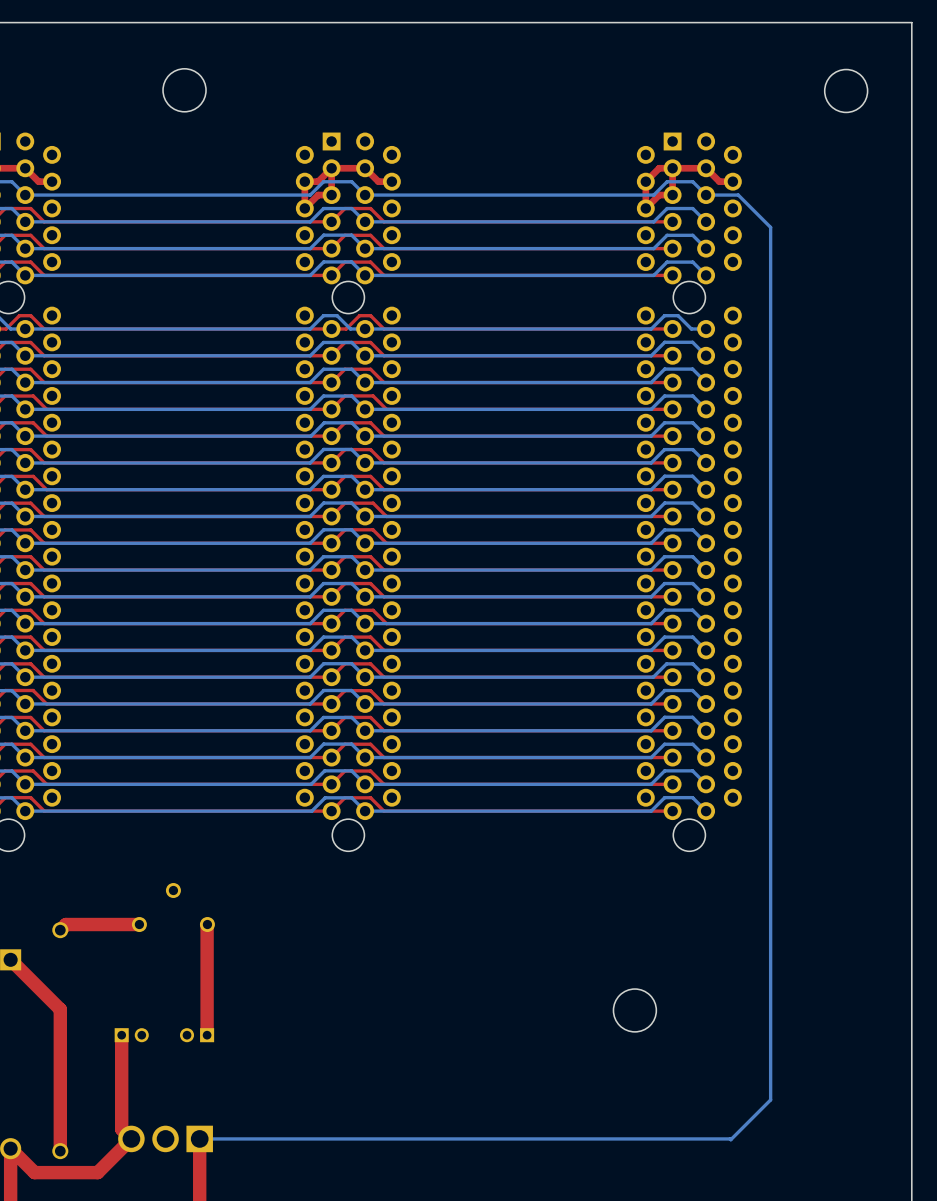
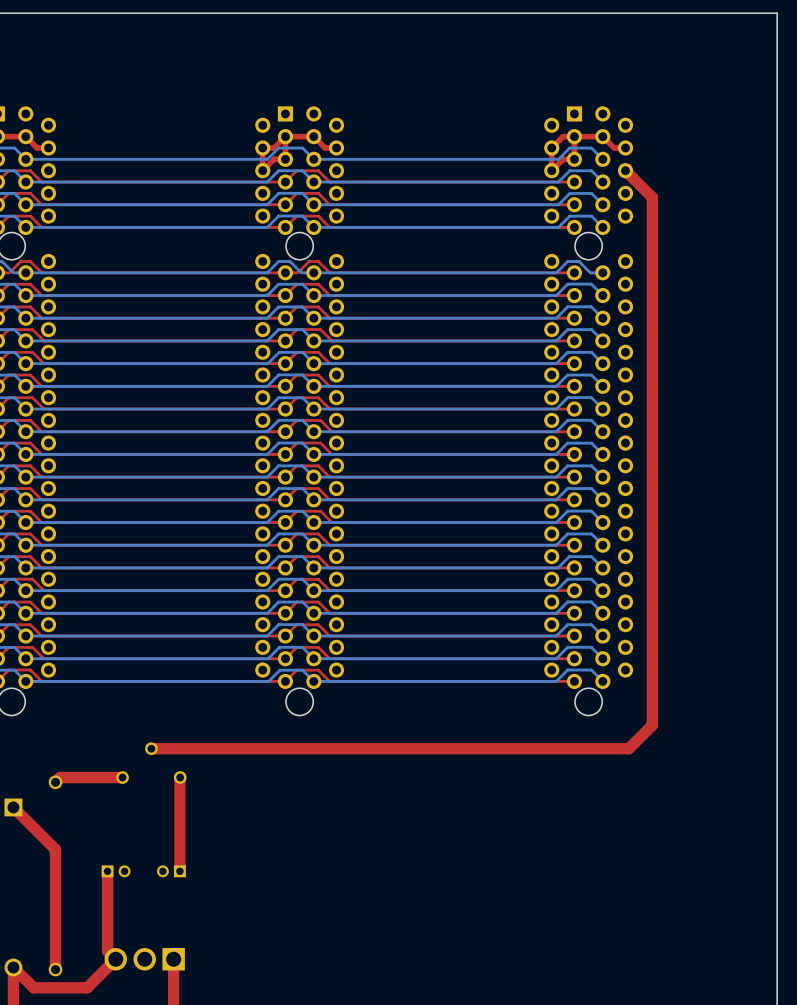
round board edge: [162, 68, 207, 113] -> none
round board edge: [824, 68, 869, 114] -> none
bottom track: (706, 195) (738, 195) (770, 227) (770, 1099) (730, 1139) (199, 1138) -> none
top track: none -> (625, 170) (652, 197) (652, 725) (628, 748) (151, 748)
round board edge: [612, 988, 658, 1033] -> none

